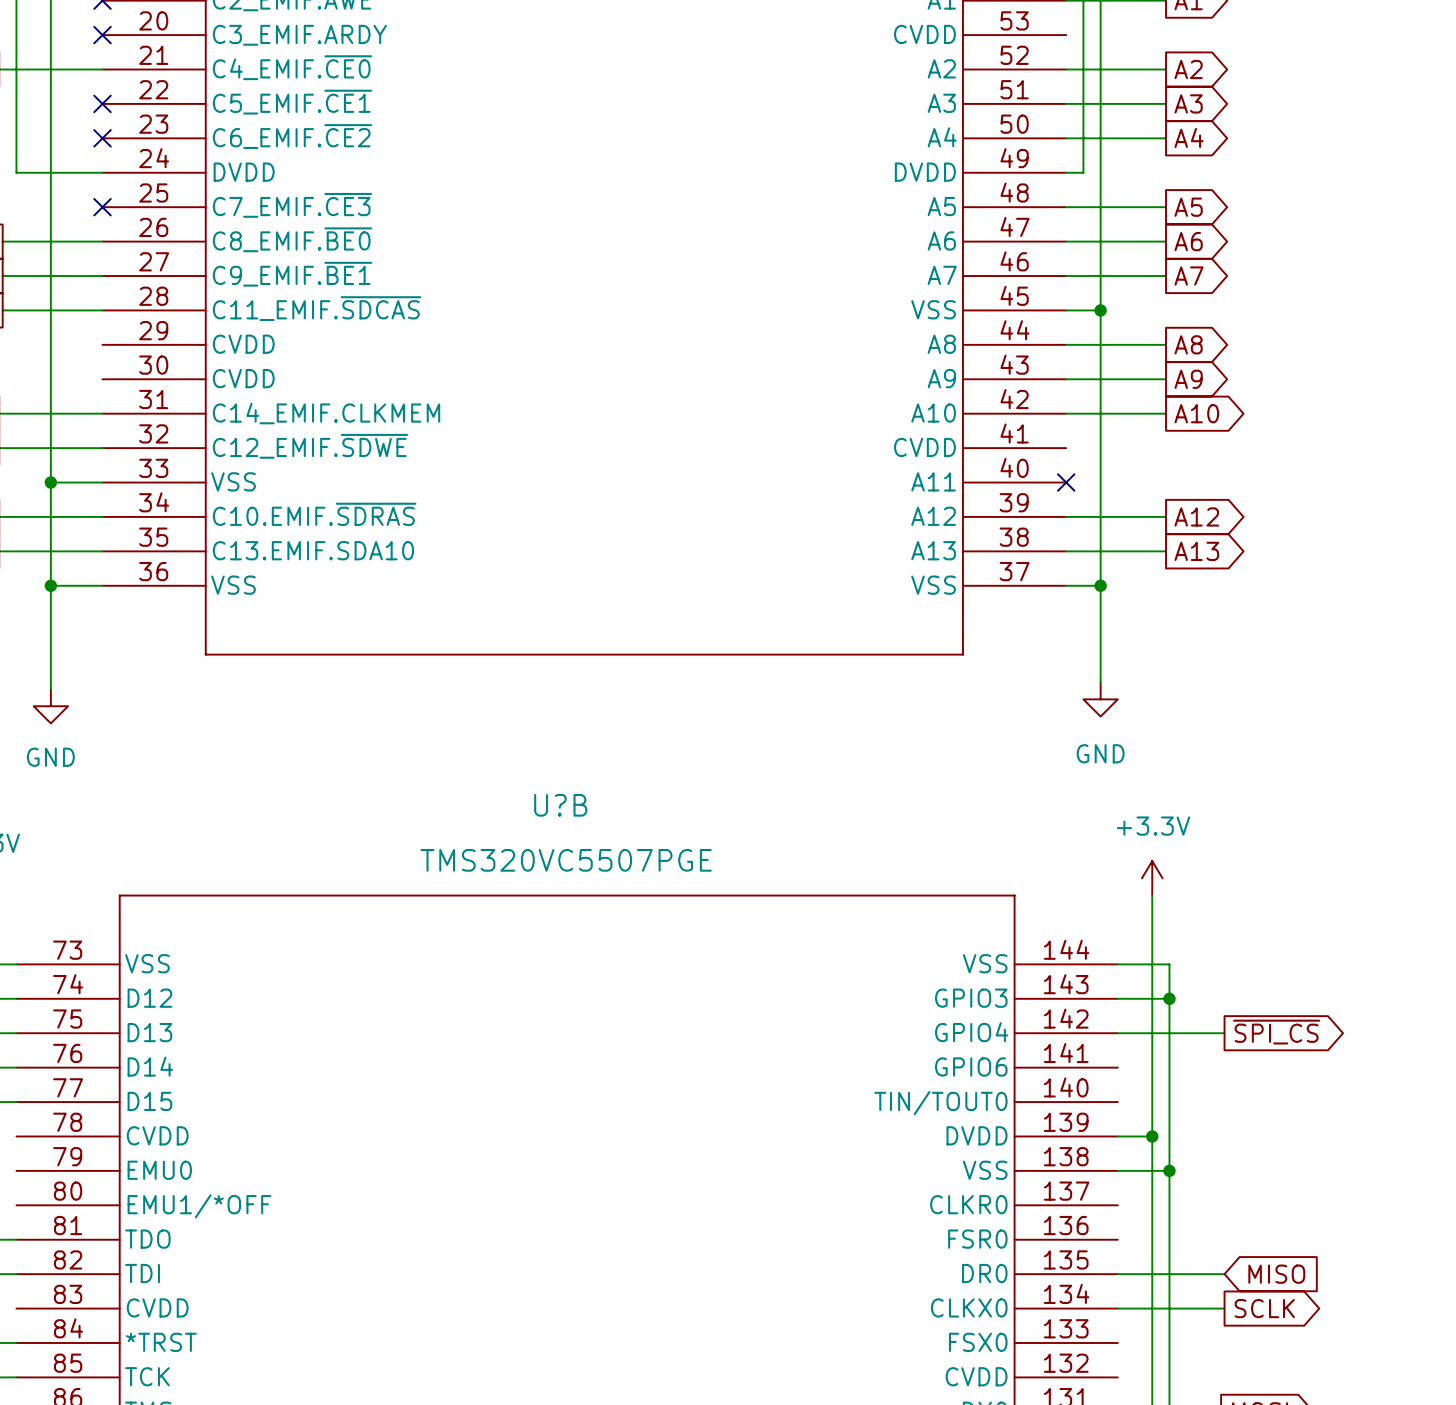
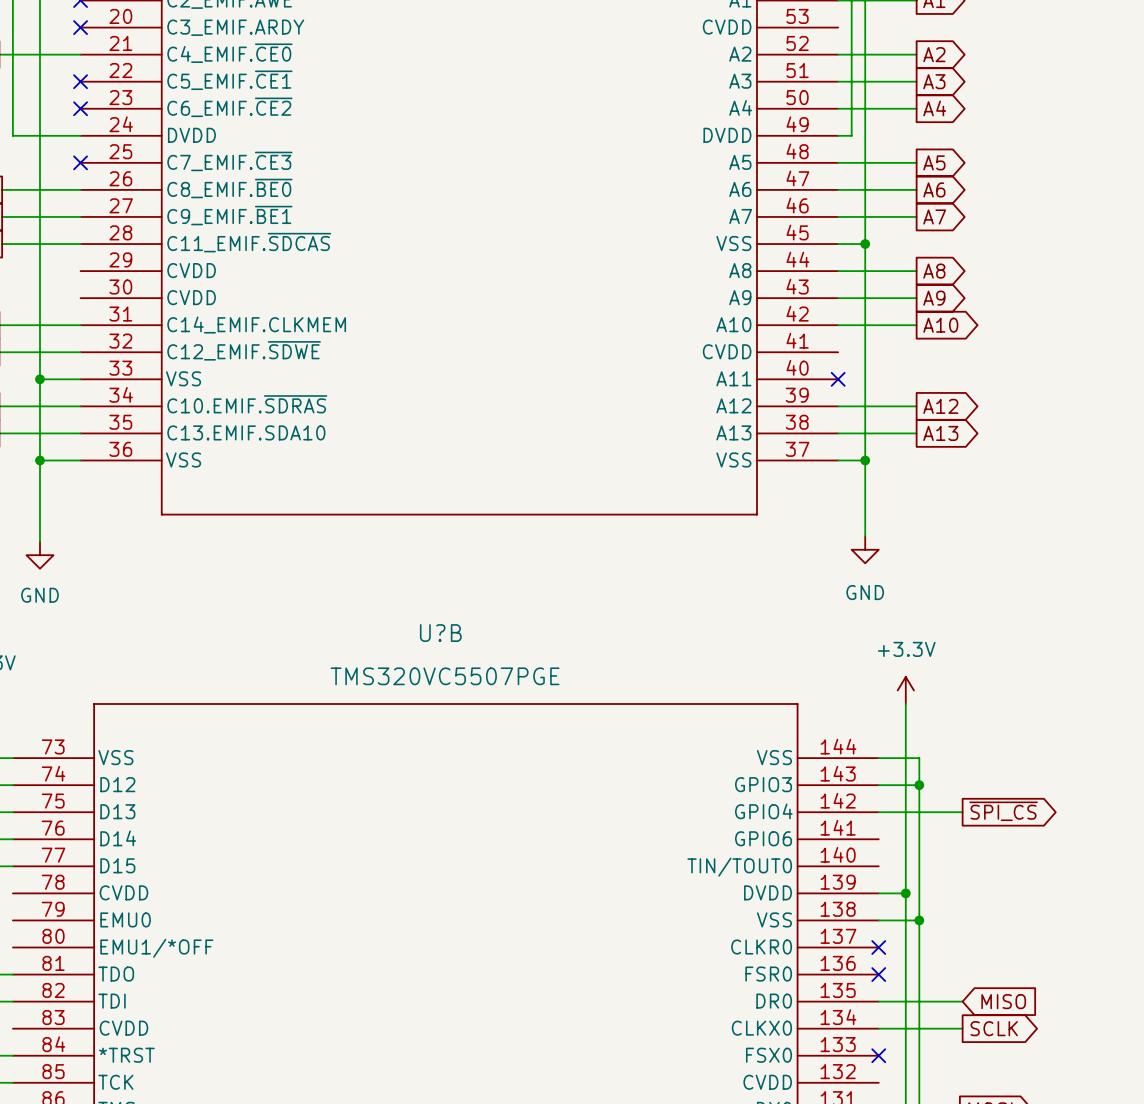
no-connect mark: none -> (878, 947)
no-connect mark: none -> (878, 974)
no-connect mark: none -> (878, 1055)

